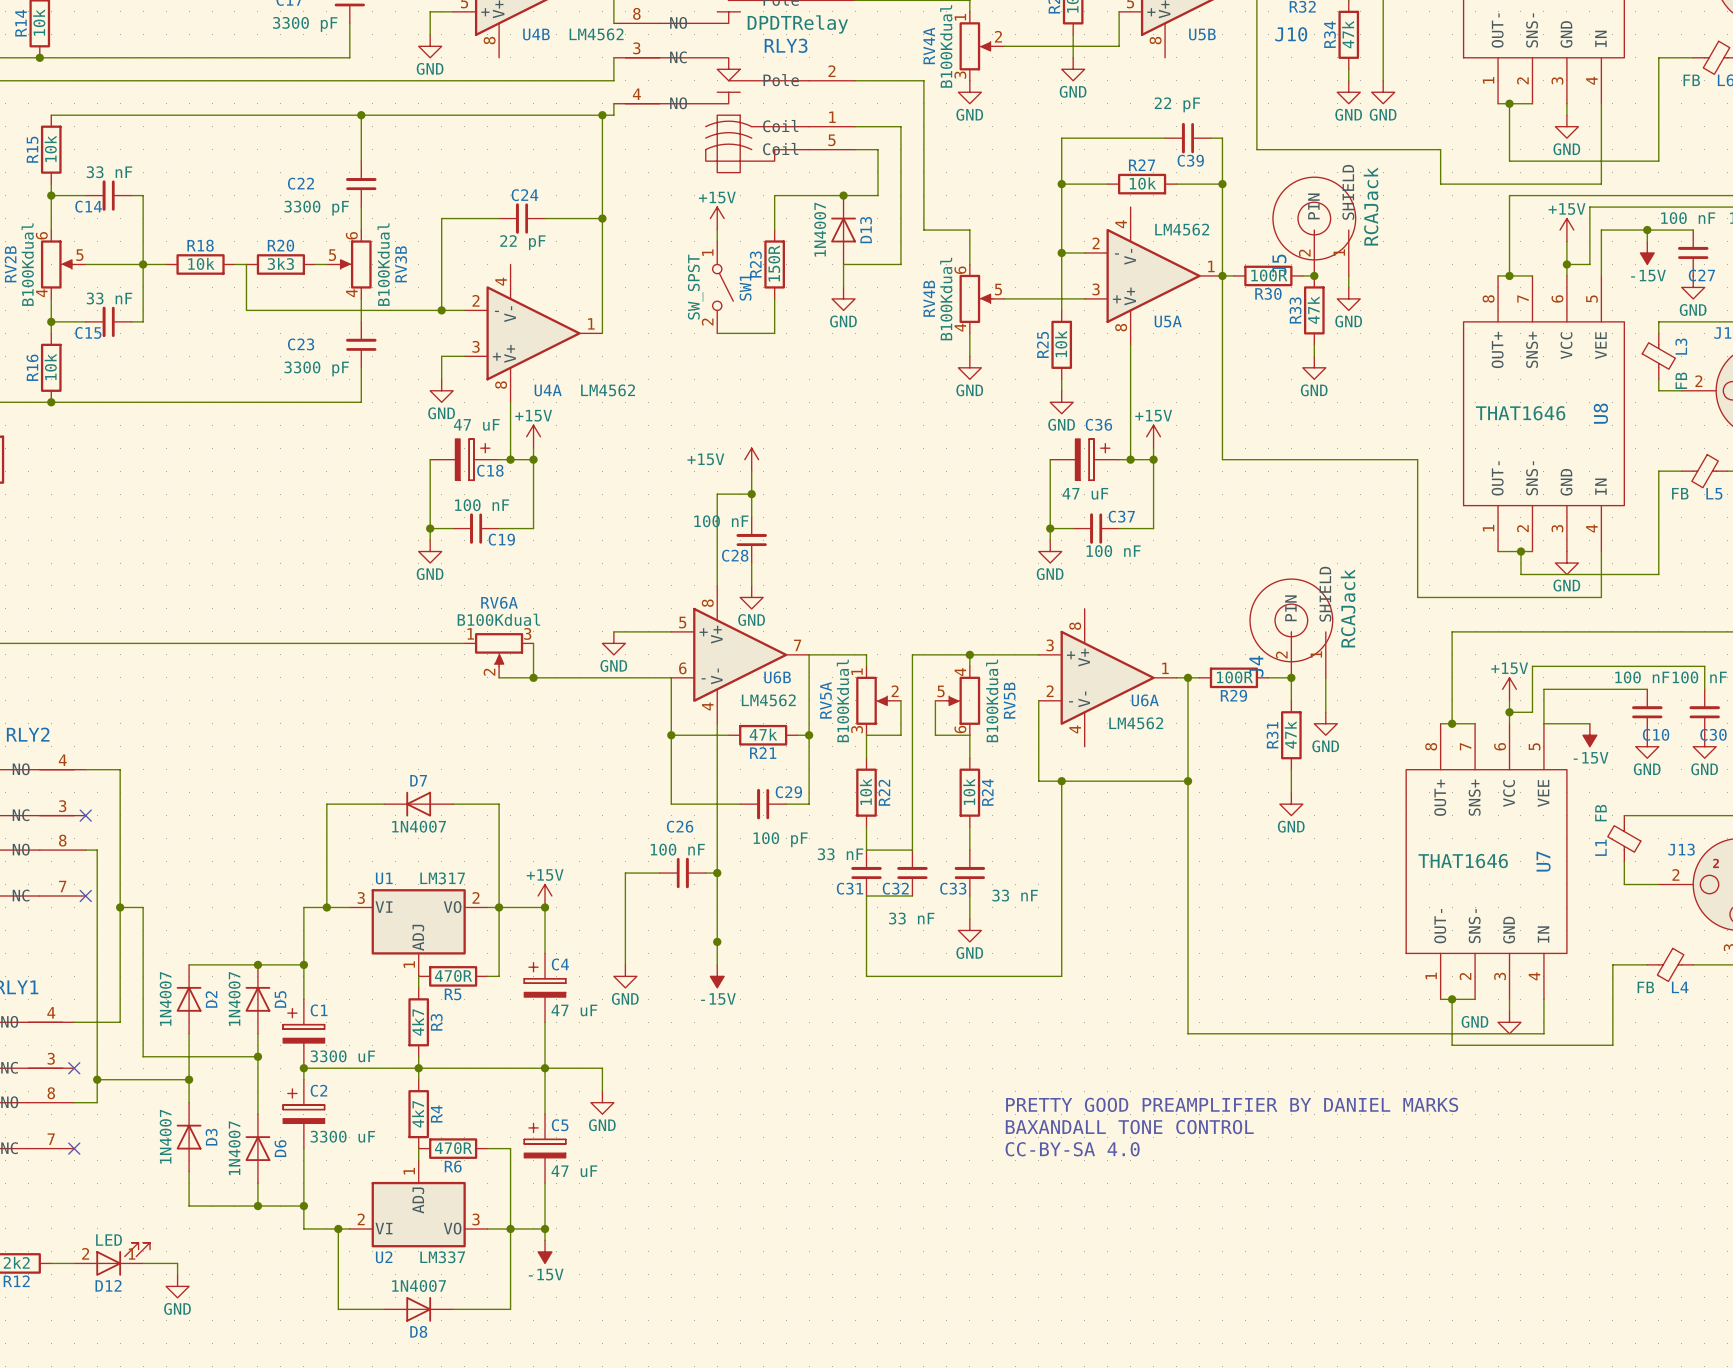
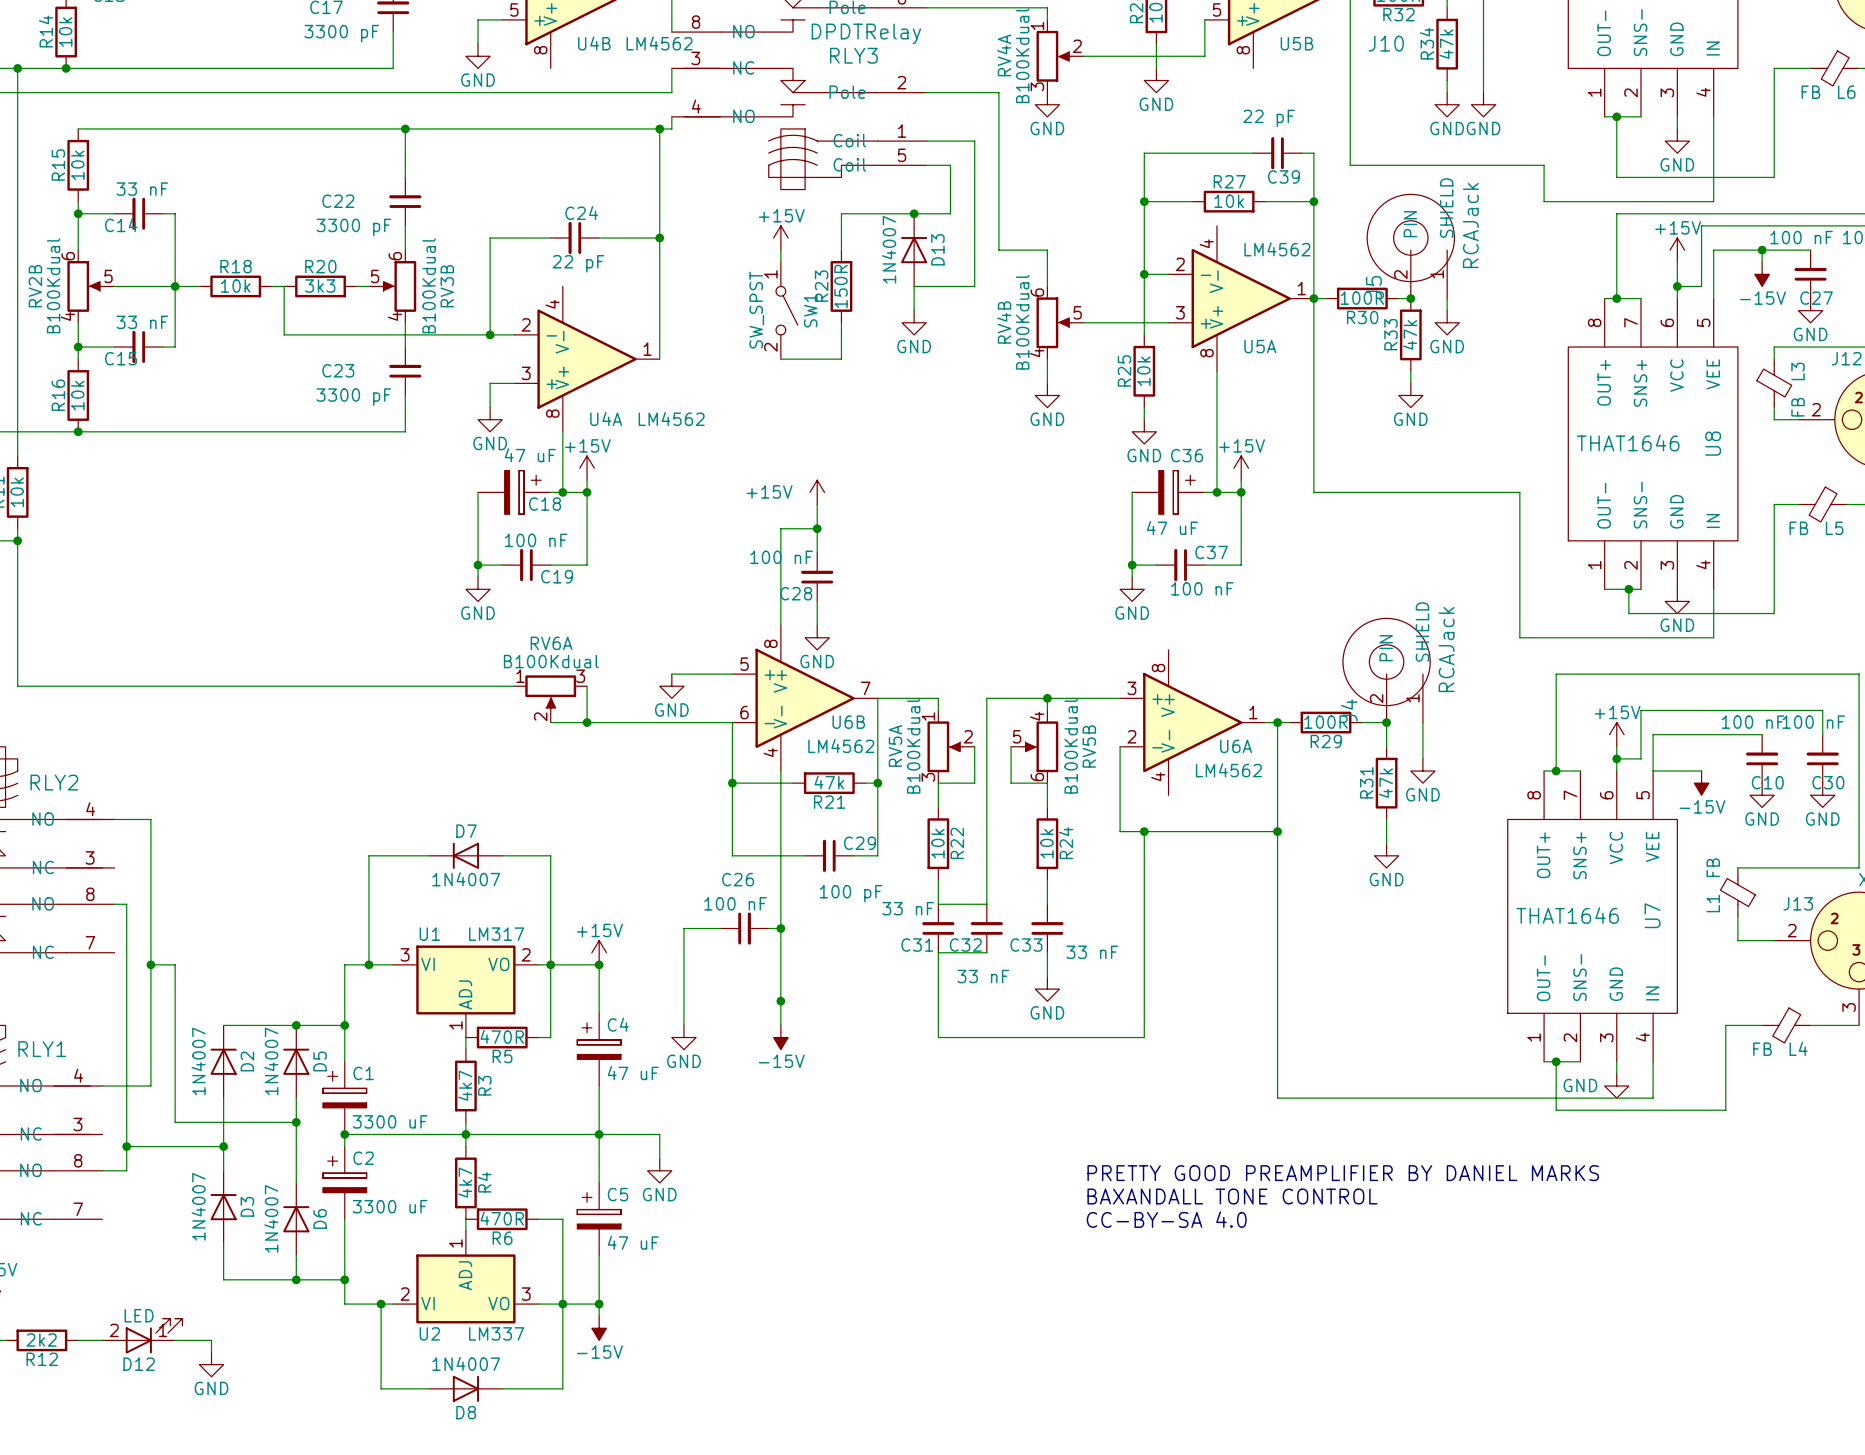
no-connect mark: (85, 815) -> none
no-connect mark: (85, 896) -> none
no-connect mark: (74, 1068) -> none
no-connect mark: (74, 1148) -> none

